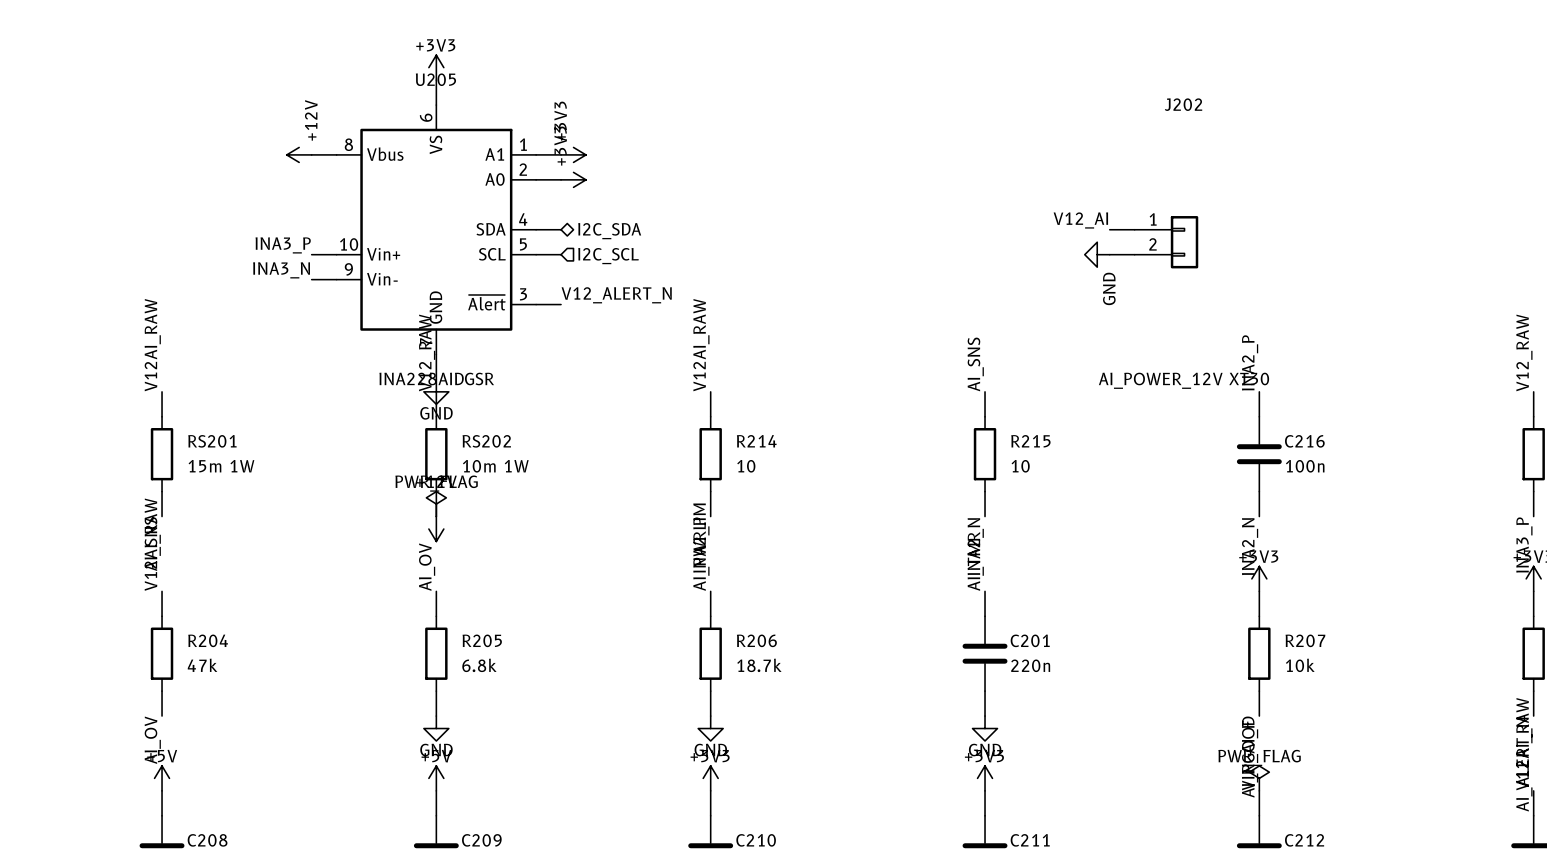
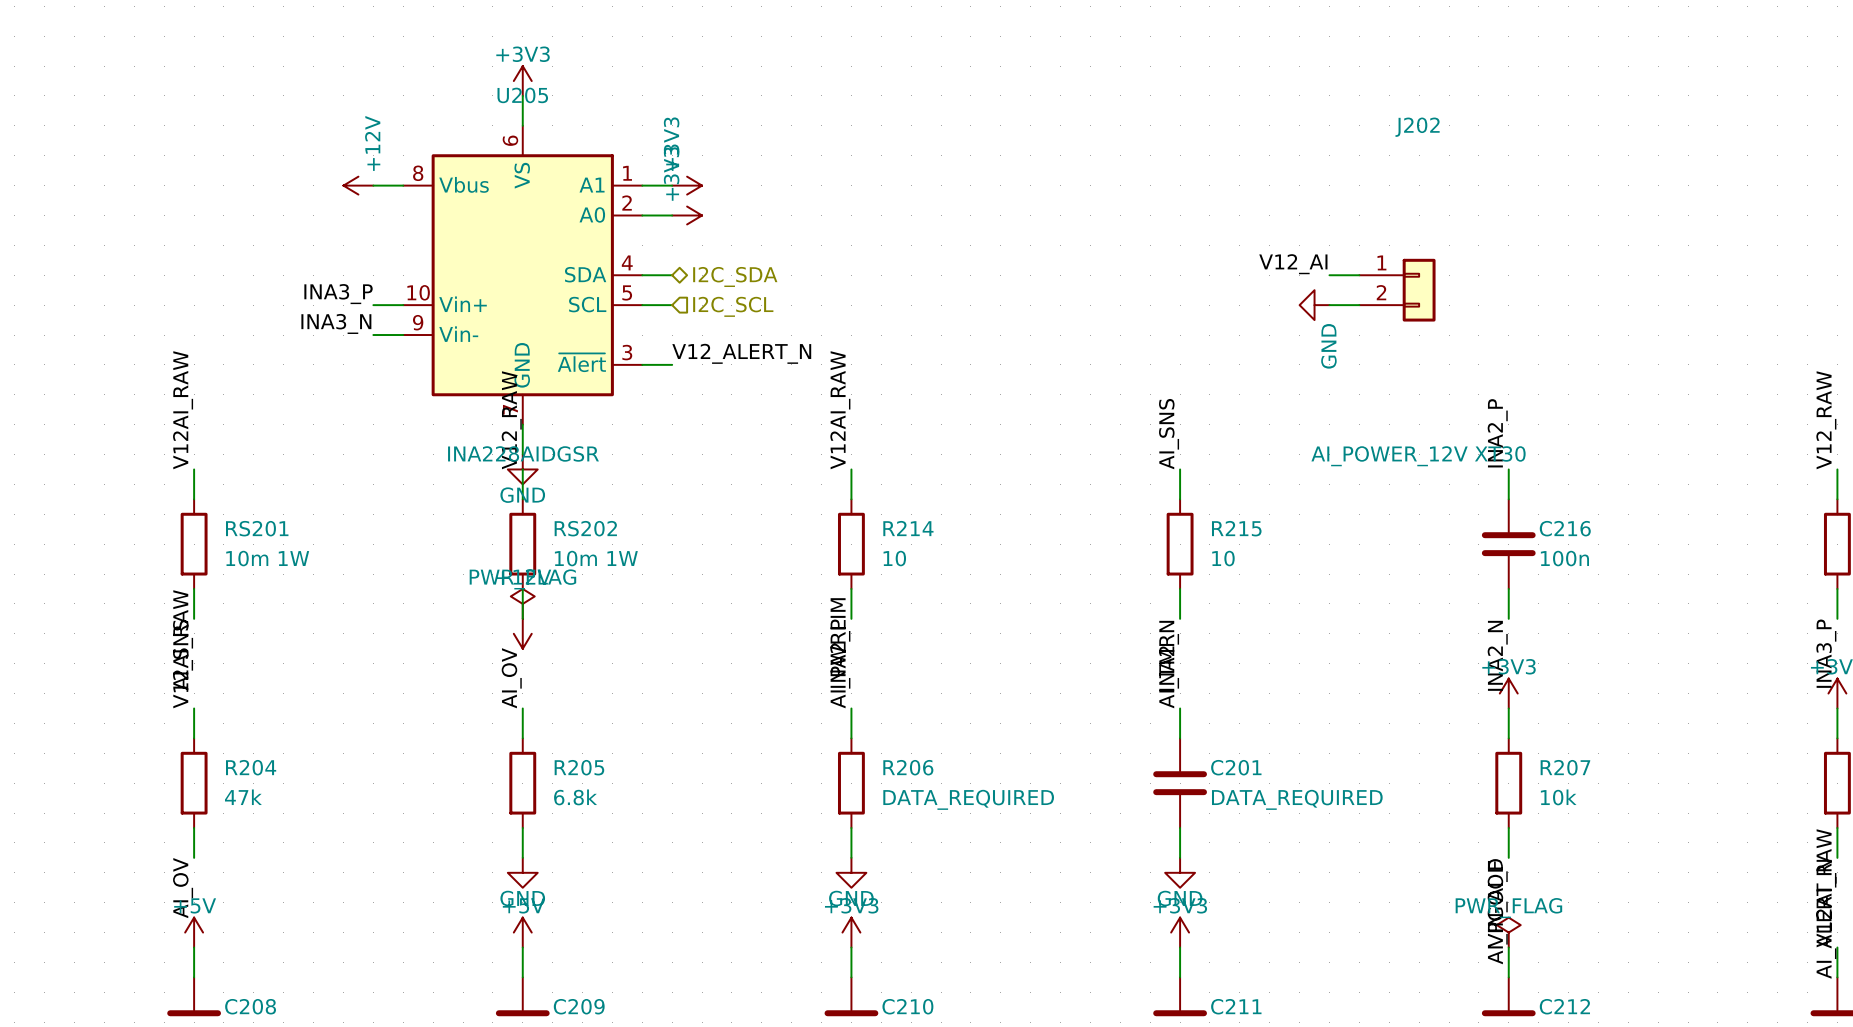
RS201 value: 15m 1W (221, 466) -> 10m 1W (267, 558)
R206 value: 18.7k (759, 665) -> DATA_REQUIRED (968, 799)
C201 value: 220n (1030, 665) -> DATA_REQUIRED (1297, 799)

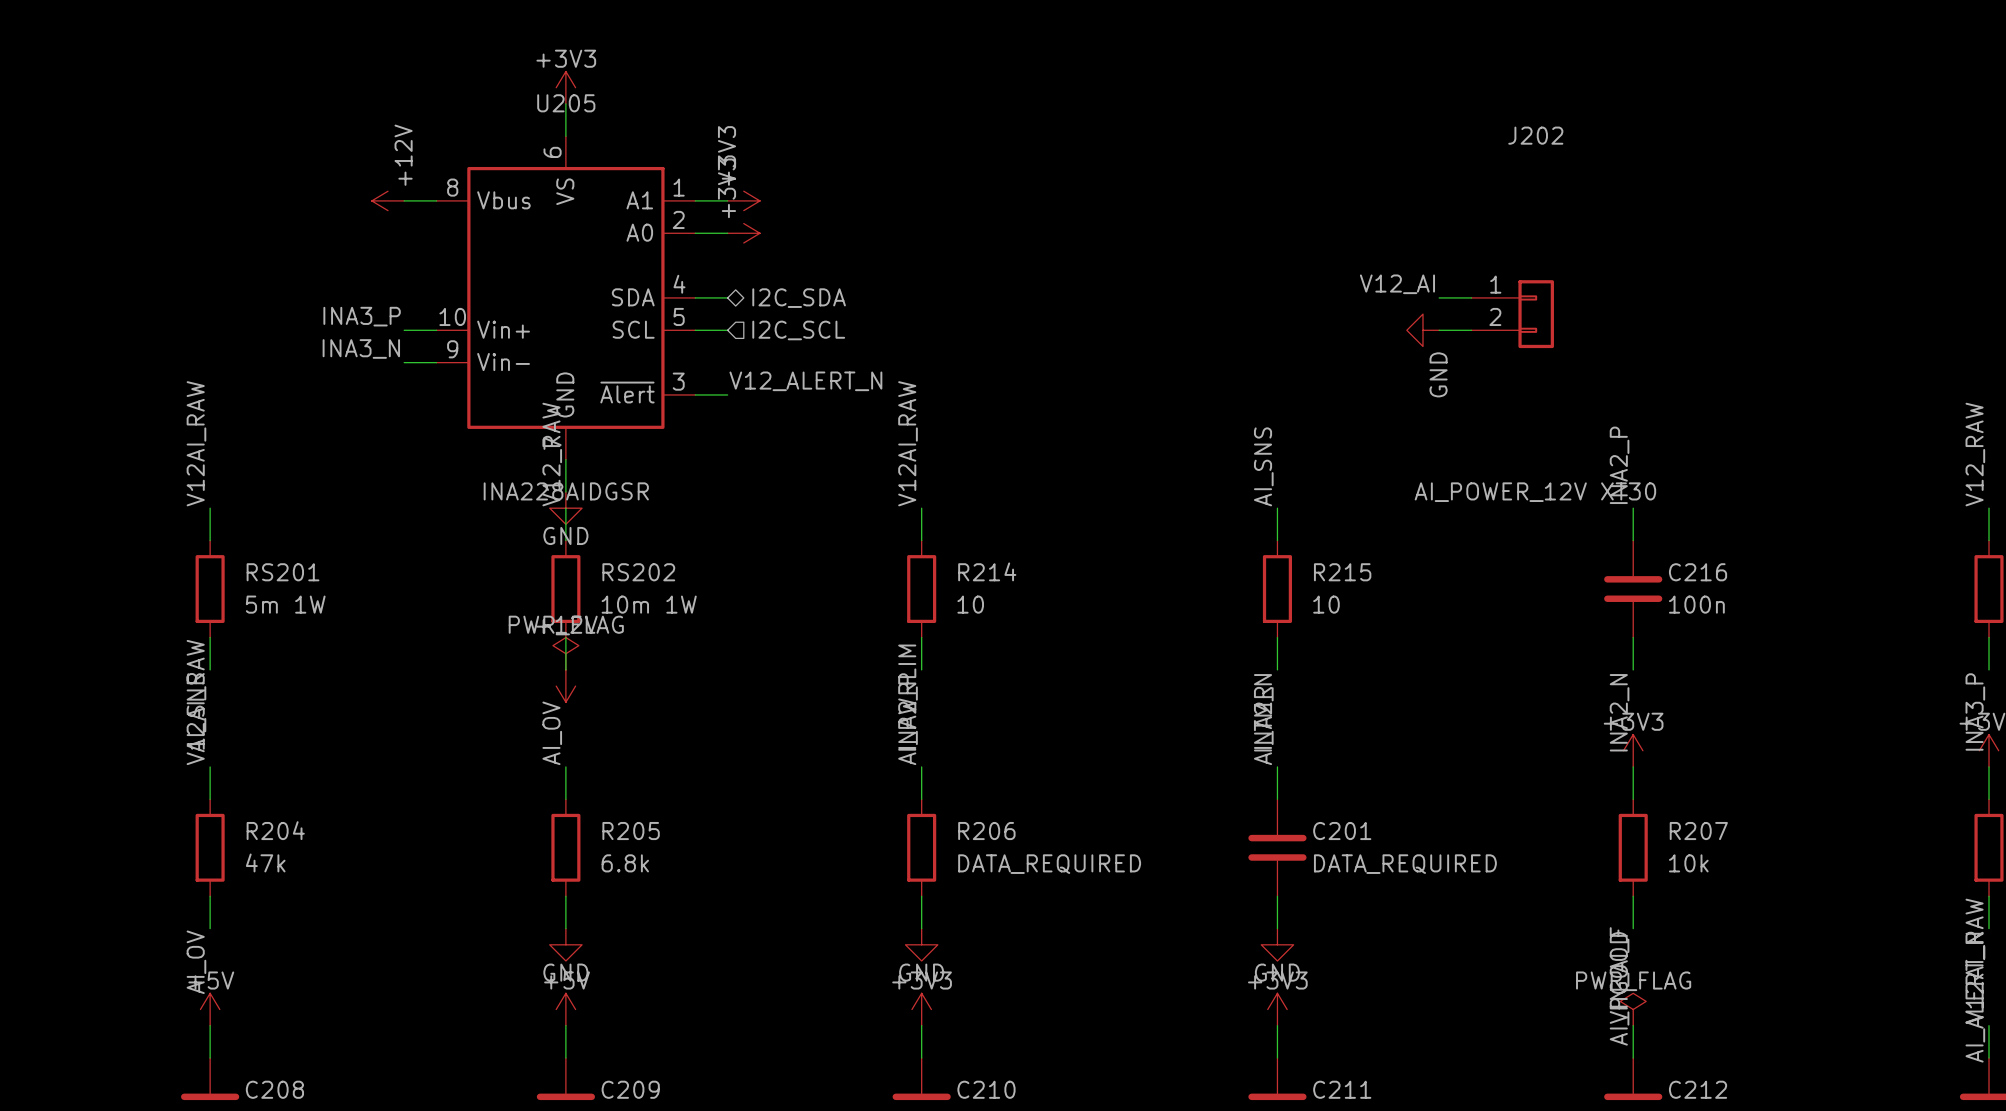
RS201 value: 10m 1W (267, 558) -> 5m 1W (285, 604)

